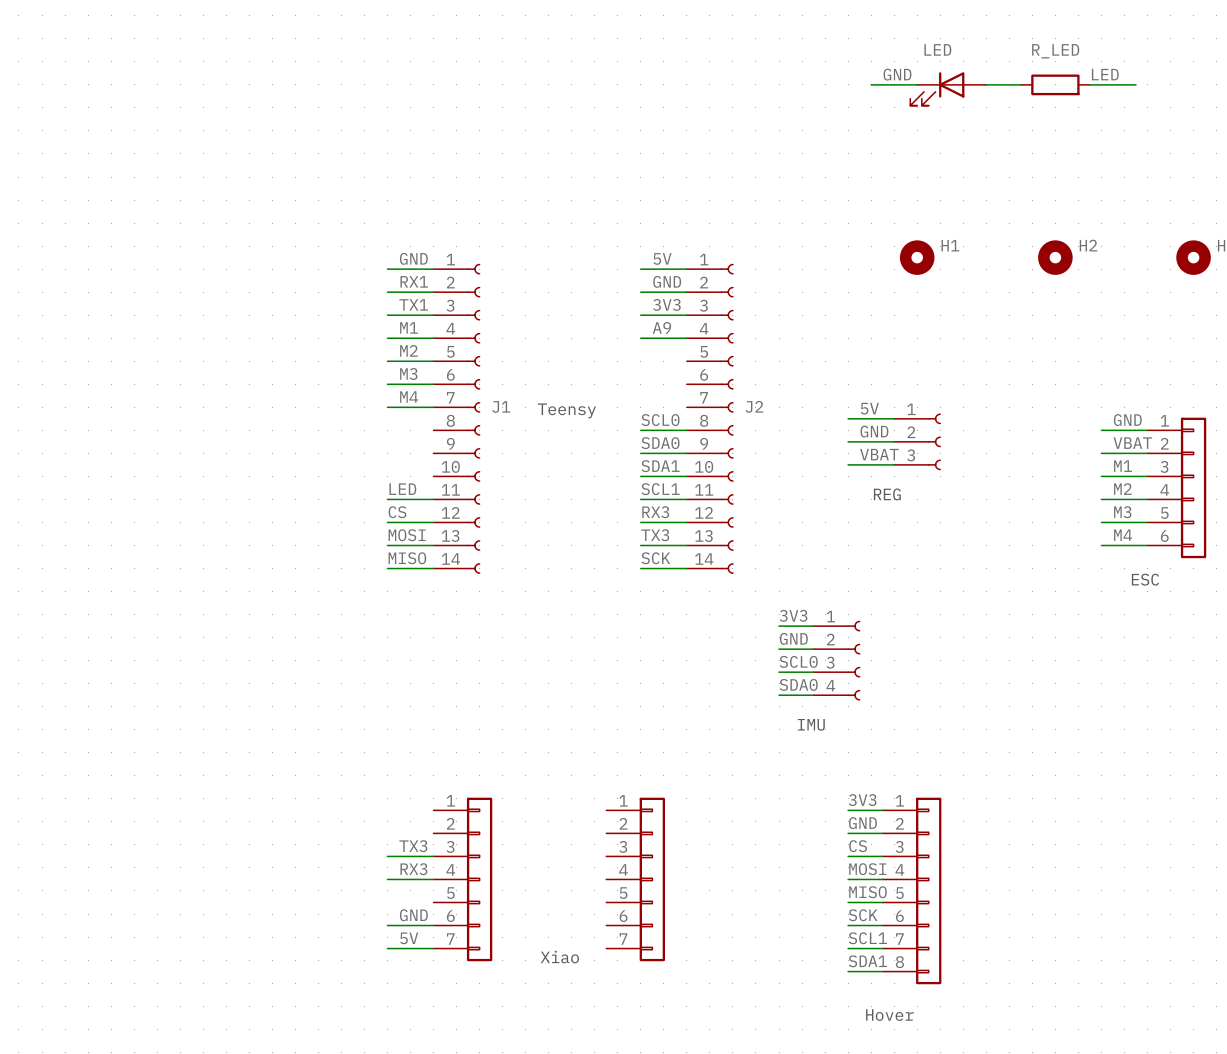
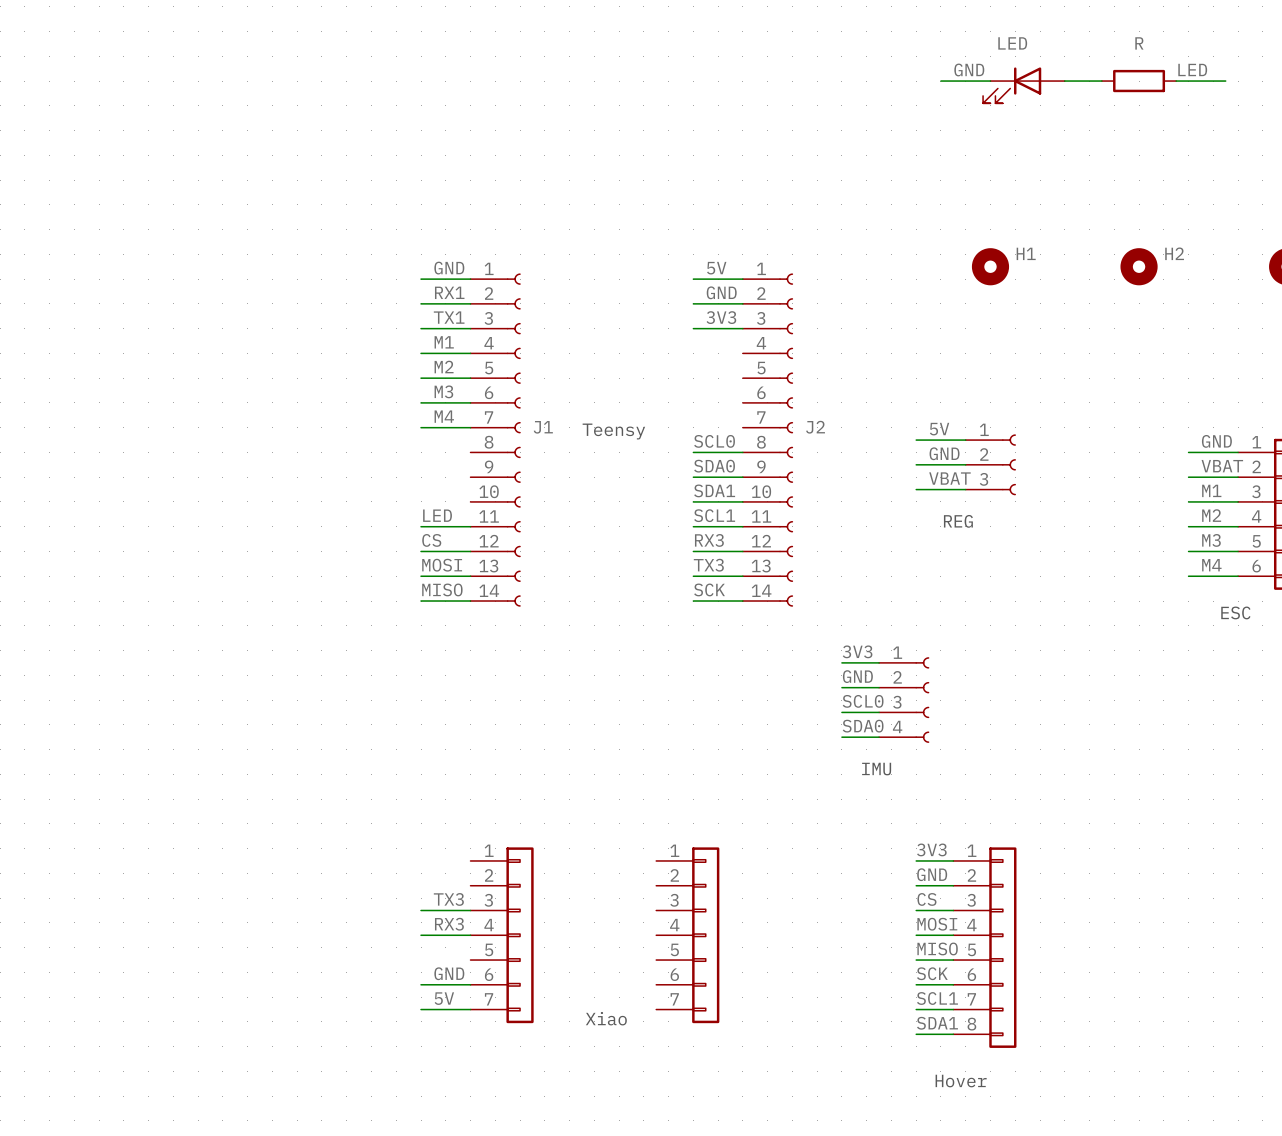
part value: R_LED (1055, 51) -> R (1139, 43)
label: A9 (661, 327) -> none
wire: (640, 338) (686, 338) -> none

